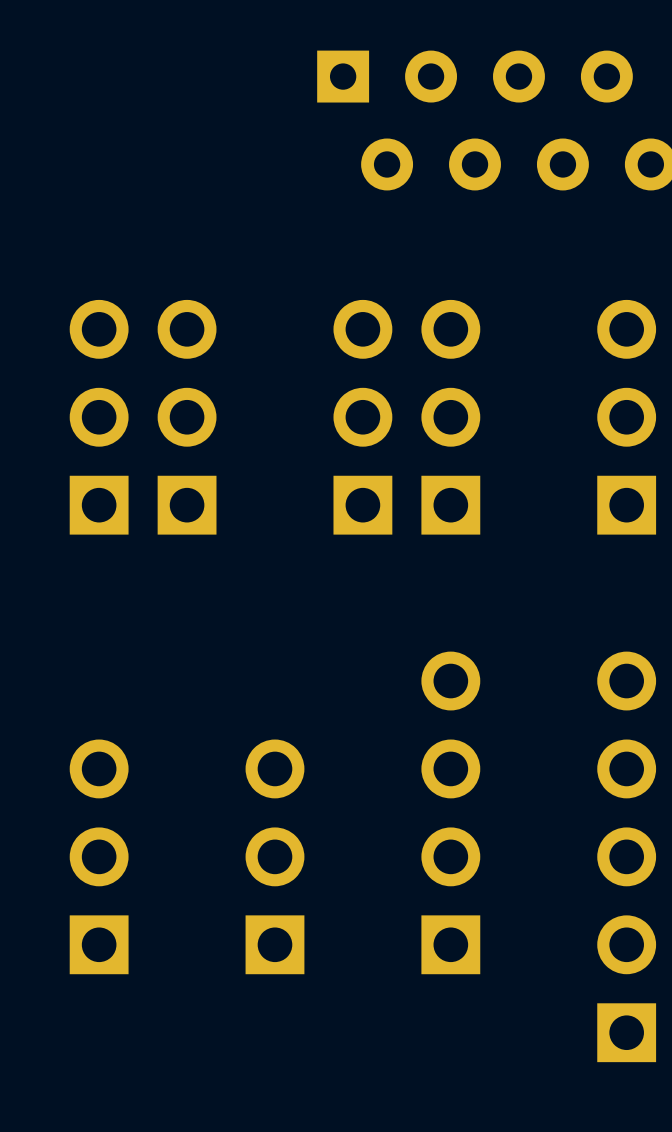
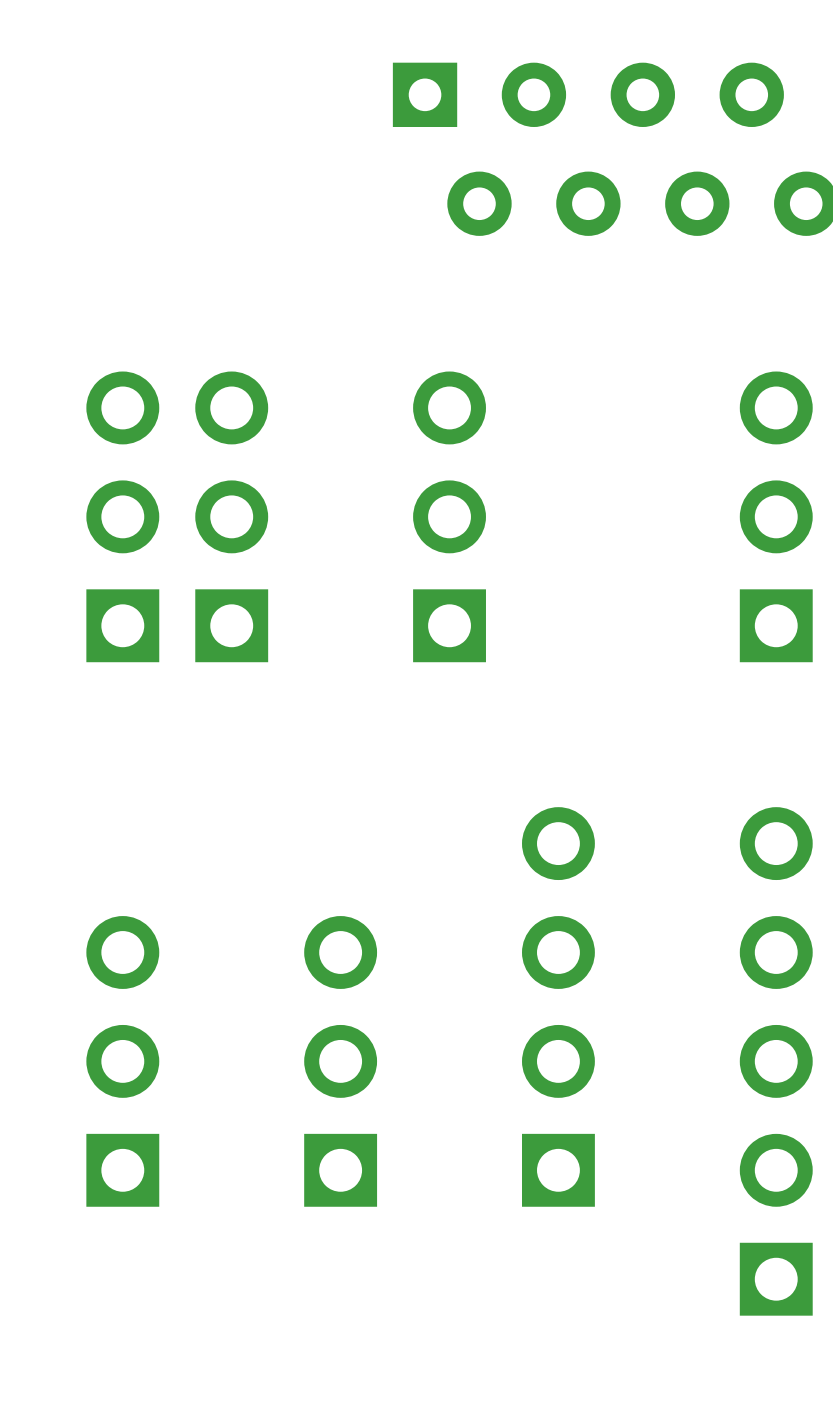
part: (406, 417) -> none

